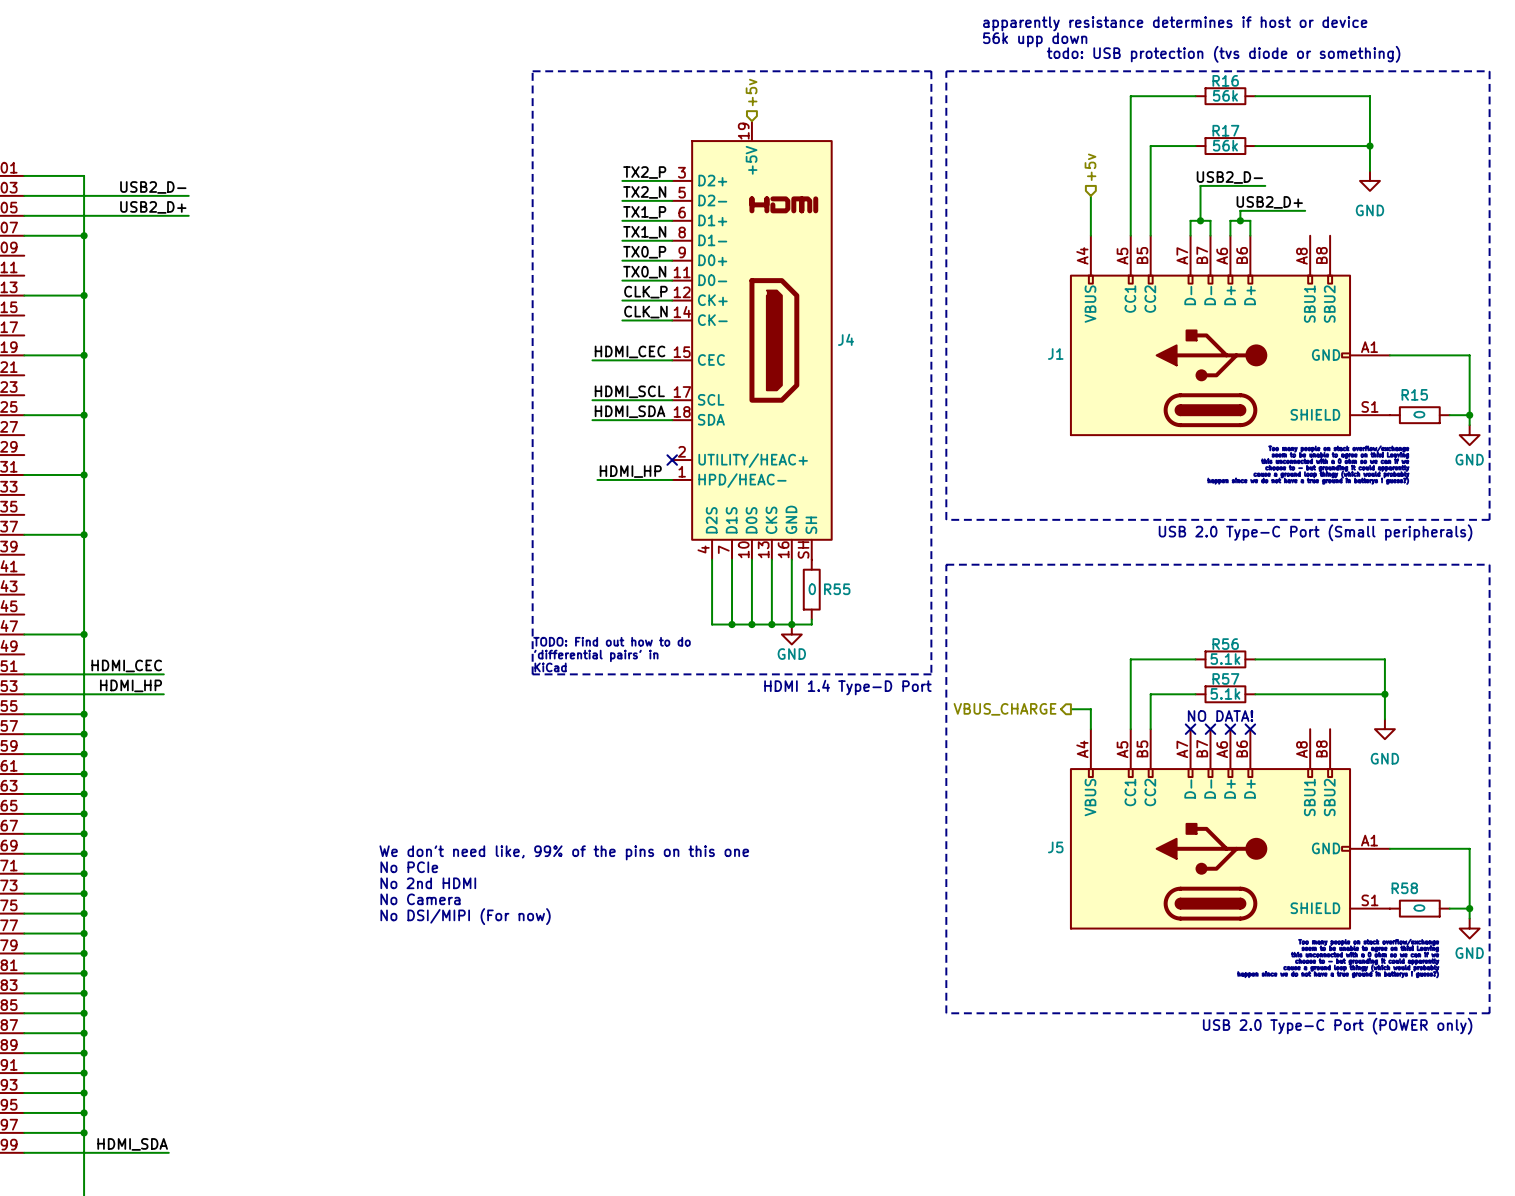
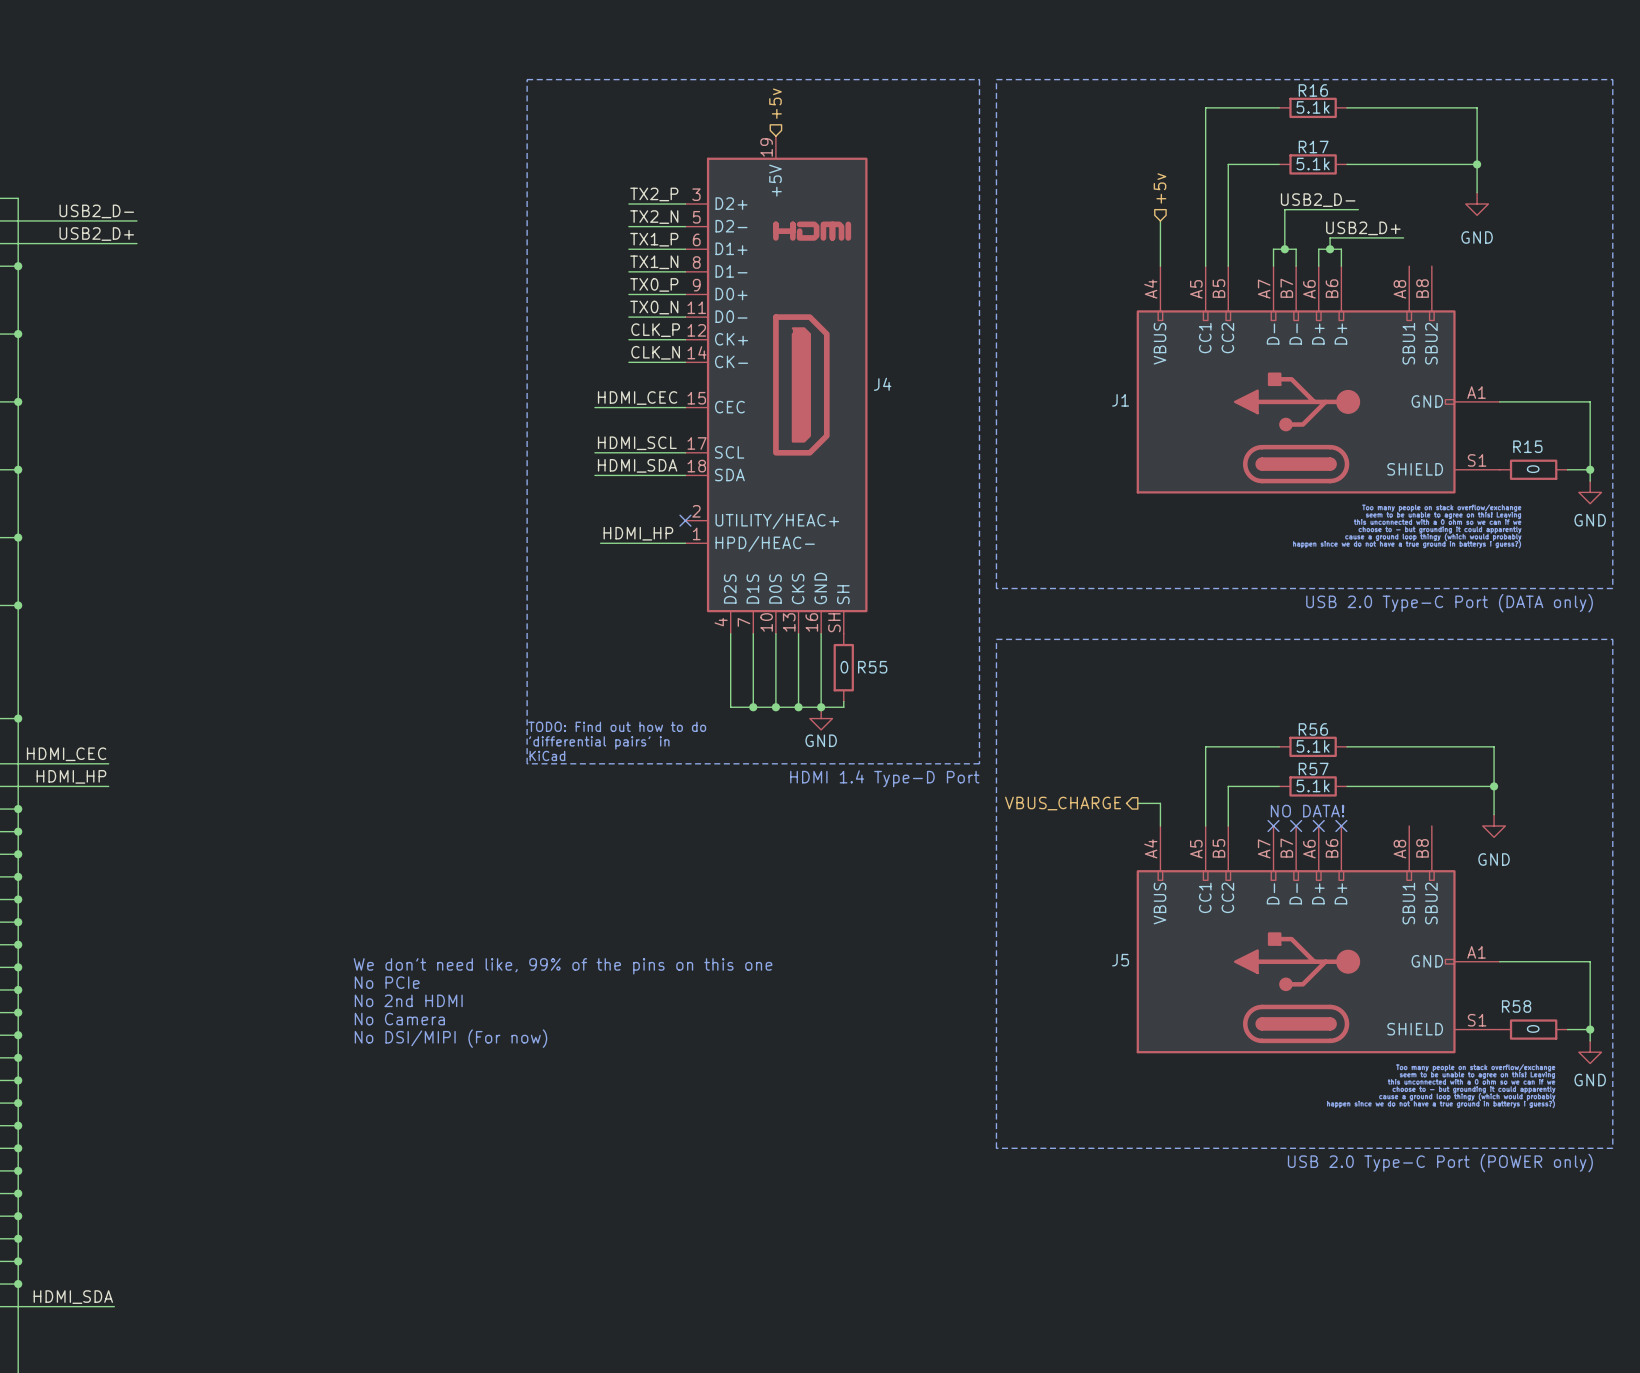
text: apparently resistance determines if host or device (1175, 23) -> none
text: 56k upp down (1035, 39) -> none
text: todo: USB protection (tvs diode or something) (1223, 54) -> none
R16 value: 56k (1225, 95) -> 5.1k (1313, 107)
R17 value: 56k (1225, 145) -> 5.1k (1313, 164)
text: USB 2.0 Type-C Port (Small peripherals) (1315, 532) -> USB 2.0 Type-C Port (DATA only) (1449, 603)

